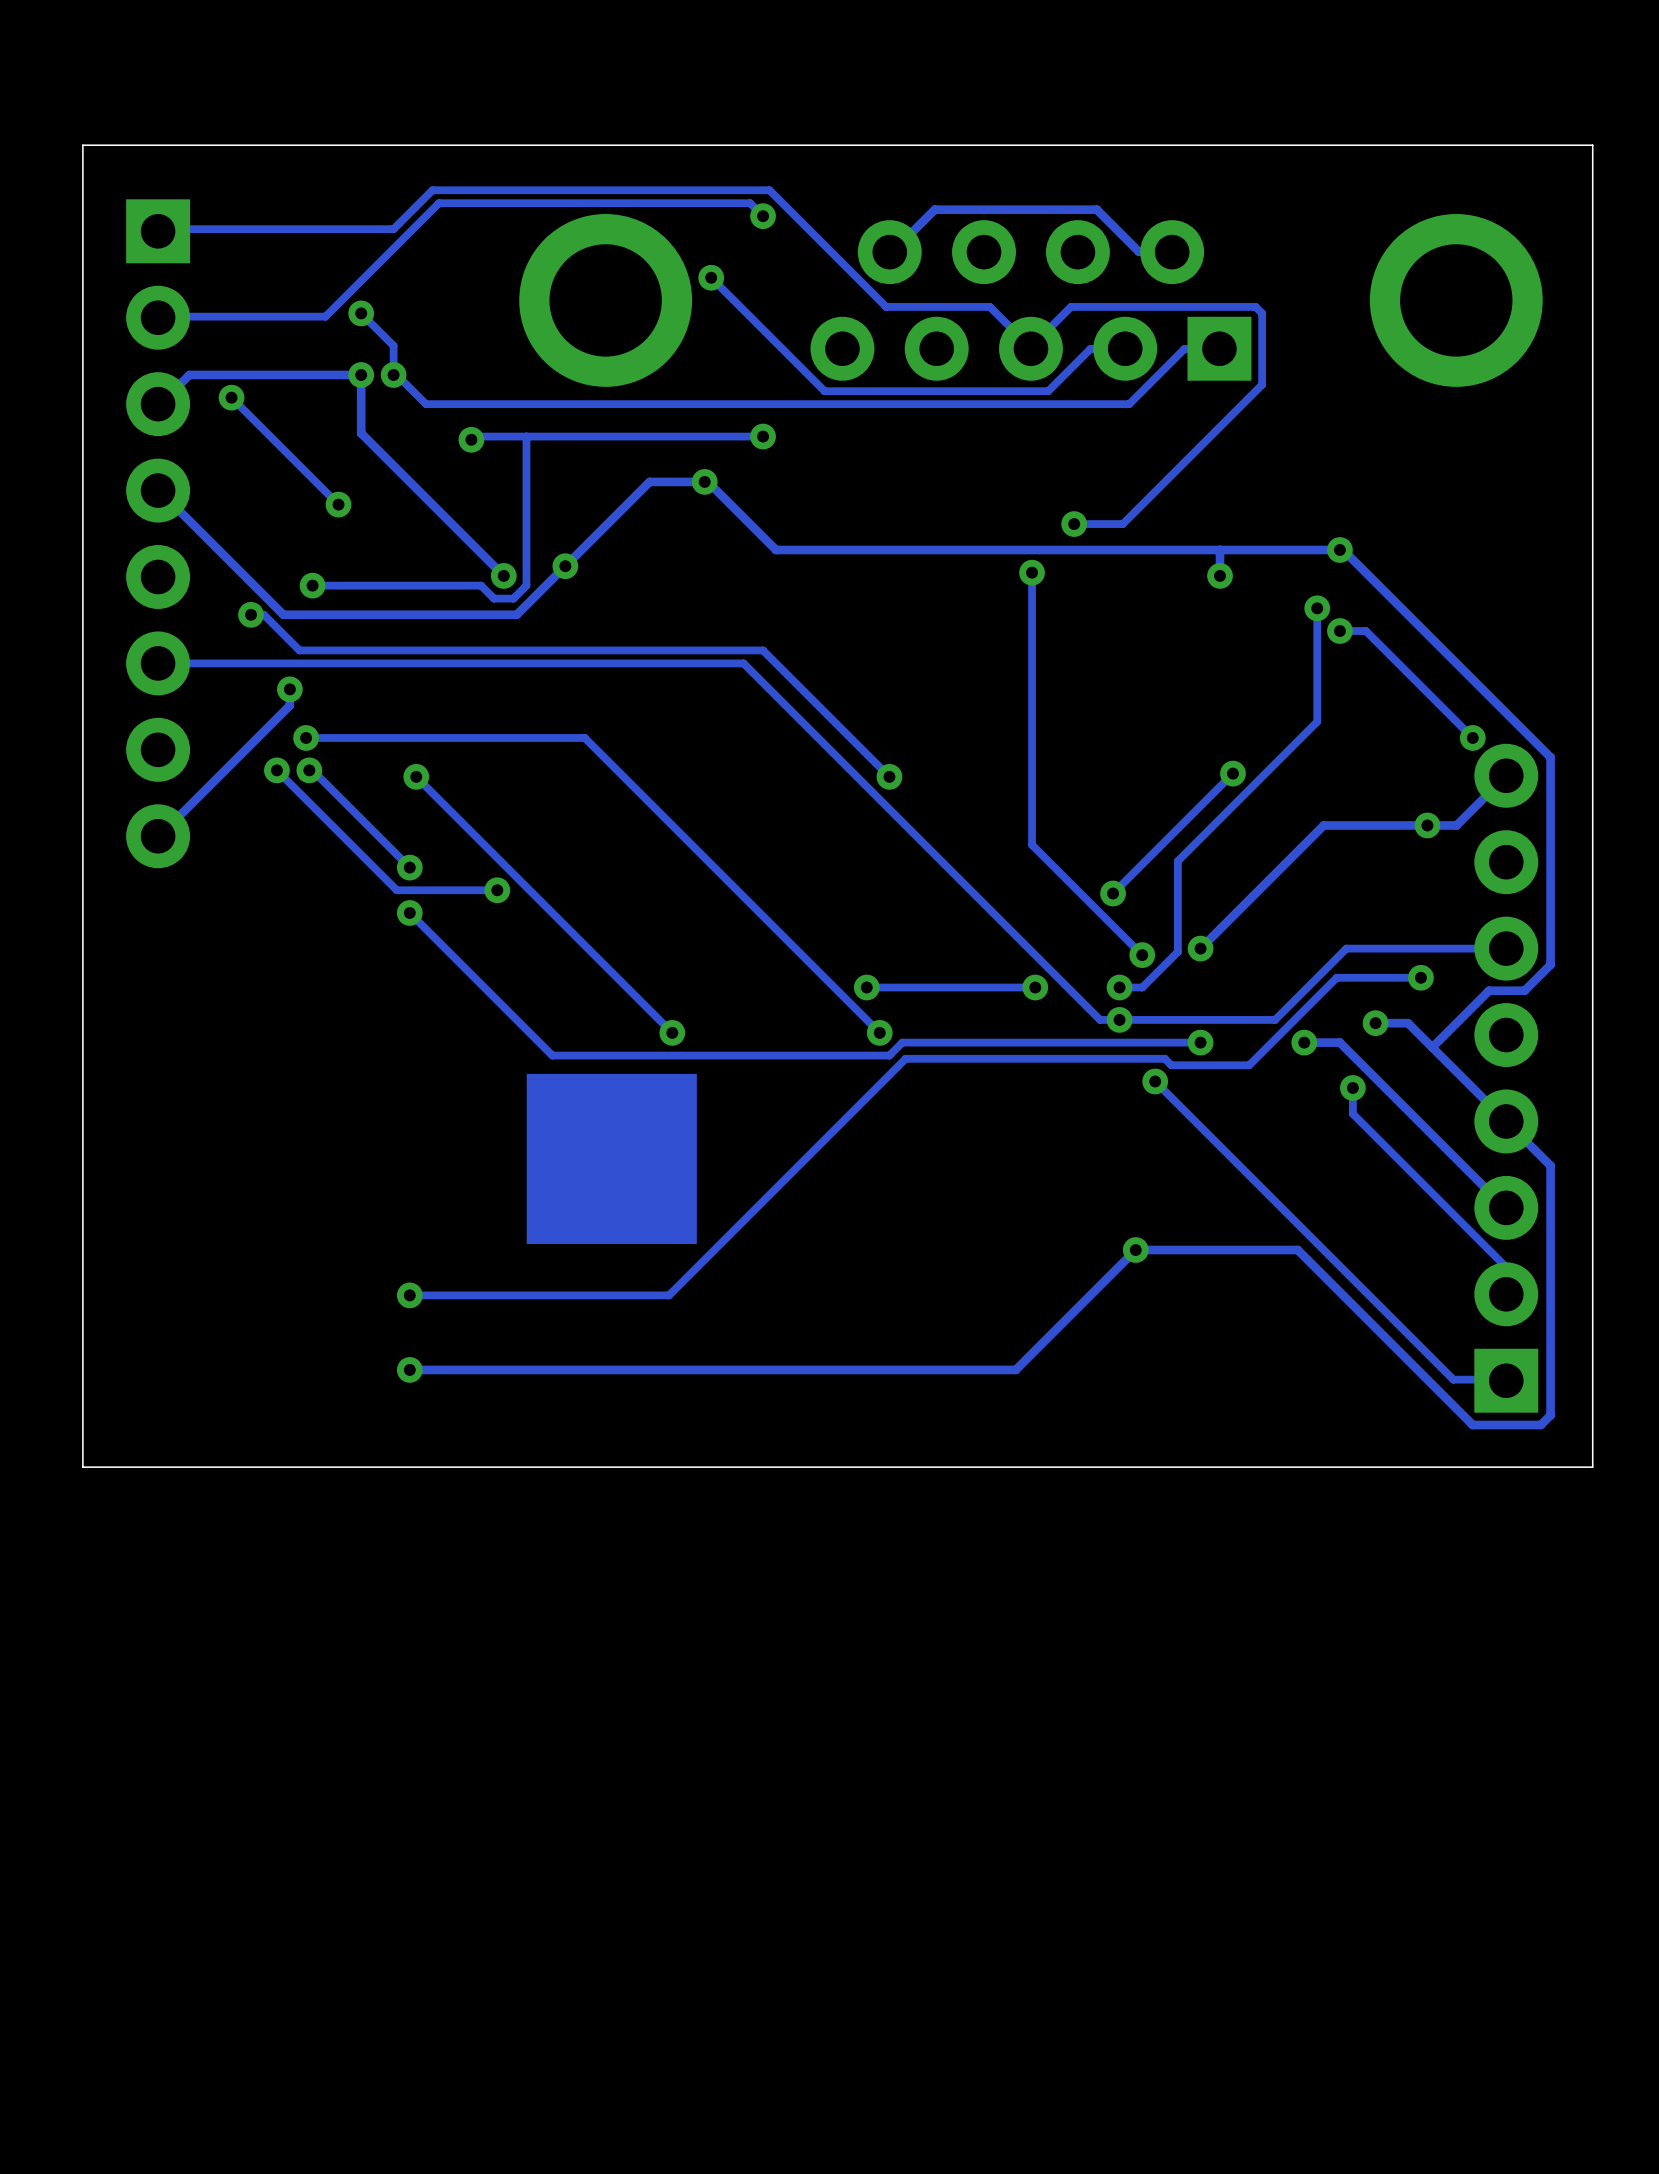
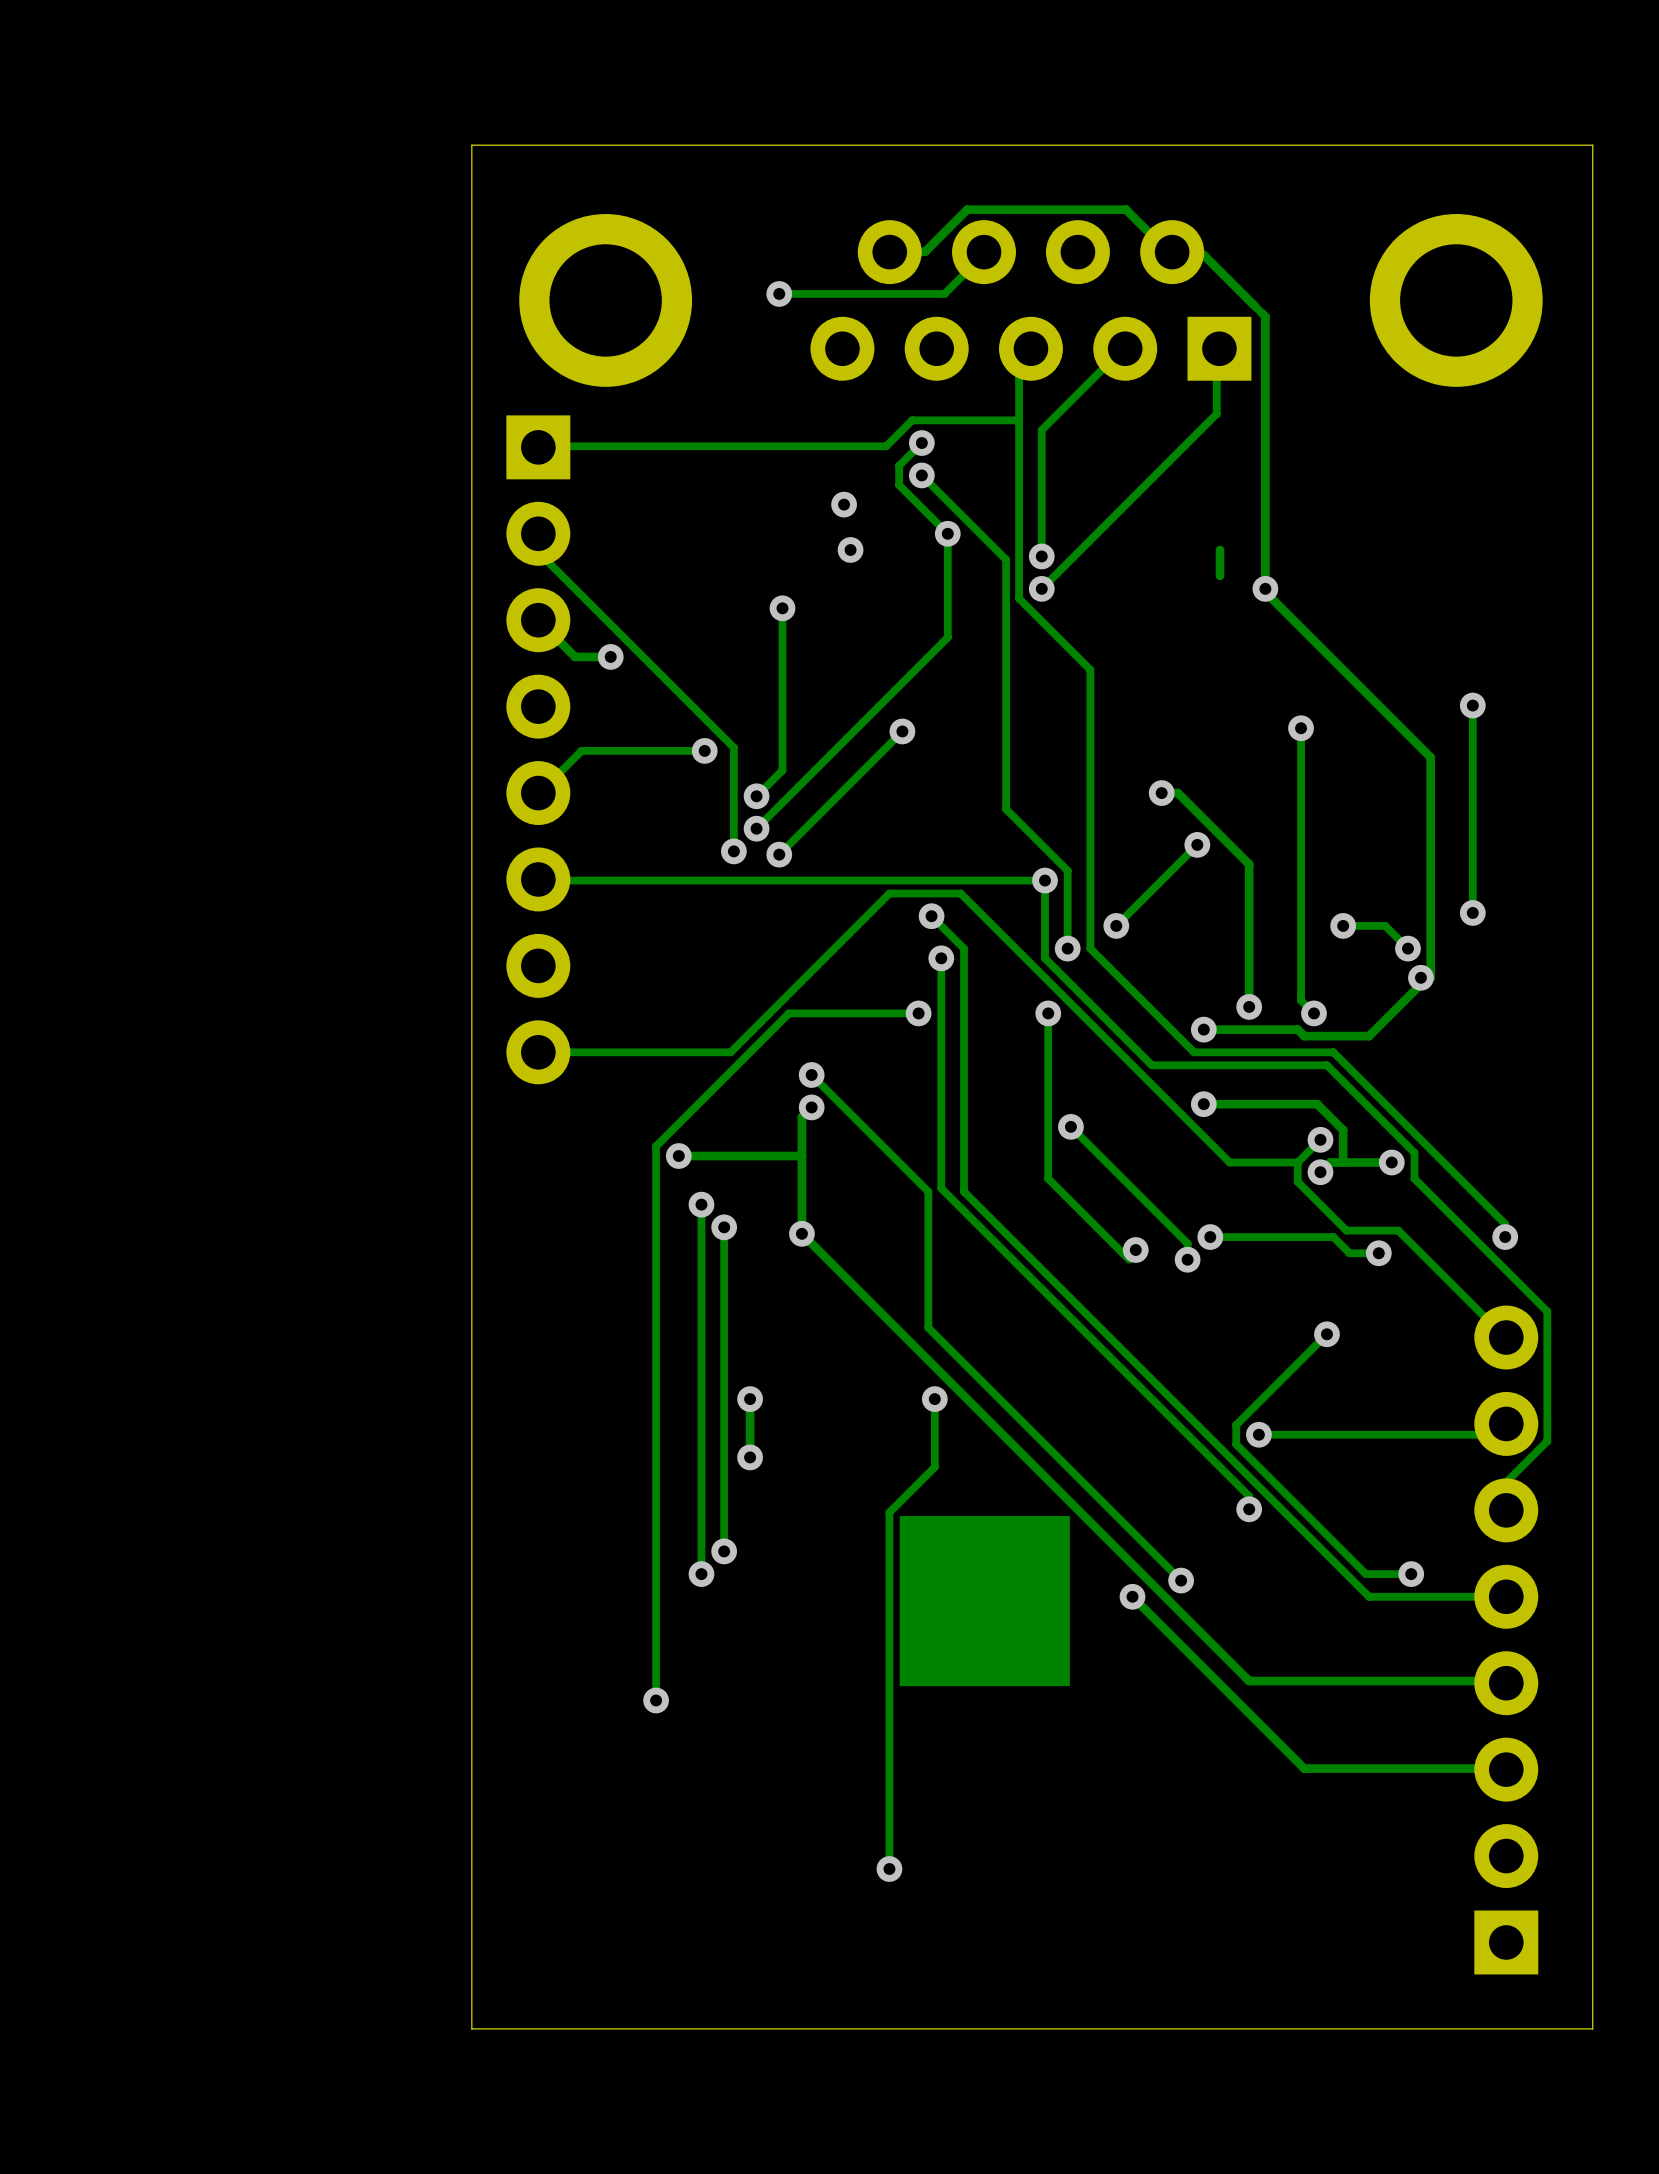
board edge: (471, 145) (82, 145) (82, 1467) (1592, 1467) -> (471, 145) (471, 2028) (1592, 2028) (1592, 1467)
track: (967, 209) (934, 209) (892, 251) -> (967, 209) (925, 251) (892, 251)
track: (1096, 209) (1138, 251) (1172, 252) -> (1096, 209) (1126, 209) (1168, 251) (1172, 252) (1174, 255) (1203, 255) (1255, 306)
track: (763, 216) (750, 203) (438, 203) (325, 316) (158, 317) -> none
via: (763, 216) -> none
track: (158, 231) (160, 229) (393, 229) (432, 190) (769, 190) (886, 306) (989, 306) (1030, 348) (1070, 306) (1255, 306) -> none
track: none -> (984, 252) (983, 255) (944, 293) (779, 293)
track: (711, 277) (824, 391) (1048, 391) (1090, 349) (1122, 349) -> (1041, 556) (1041, 430) (1122, 349)
via: (711, 277) -> none
via: none -> (779, 293)
track: (361, 313) (393, 345) (393, 374) (396, 374) (426, 404) (1129, 404) (1184, 349) (1216, 349) -> (1041, 588) (1216, 413) (1216, 349)
via: (361, 313) -> none
track: (1262, 313) (1262, 384) (1122, 524) (1074, 524) -> (1262, 313) (1265, 316) (1265, 592) (1430, 757) (1430, 977) (1427, 977) (1369, 1036) (1304, 1036) (1297, 1029) (1203, 1029)
track: none -> (1030, 348) (1019, 358) (1019, 598) (1090, 669) (1090, 948) (1194, 1052) (1333, 1052) (1505, 1224) (1505, 1237)
via: (361, 374) -> none
via: (393, 374) -> none
track: (231, 397) (338, 504) -> none
via: (231, 397) -> none
track: (158, 404) (189, 374) (361, 374) (361, 433) (503, 575) -> none
track: none -> (1019, 420) (912, 420) (886, 446) (538, 447)
track: (526, 436) (526, 585) (513, 598) (494, 598) (481, 585) (312, 585) -> none
track: (763, 436) (474, 436) (471, 439) -> none
via: (763, 436) -> none
via: (471, 439) -> none
track: none -> (921, 443) (899, 465) (899, 485) (947, 533) (947, 637) (756, 828)
via: none -> (921, 443)
track: none -> (921, 475) (1006, 559) (1006, 809) (1067, 870) (1067, 948)
via: none -> (921, 475)
via: (704, 481) -> none
track: (158, 490) (283, 614) (516, 614) (649, 481) (707, 481) (776, 549) (1343, 549) (1550, 757) (1550, 964) (1524, 990) (1489, 990) (1432, 1047) -> none
via: (338, 504) -> none
via: none -> (844, 504)
via: (1074, 524) -> none
part position: (158, 533) -> (538, 749)
track: none -> (538, 533) (539, 553) (733, 747) (733, 851)
via: none -> (947, 533)
via: none -> (850, 549)
via: (1339, 549) -> none
via: none -> (1041, 556)
via: (565, 566) -> none
track: (1032, 572) (1032, 844) (1142, 955) -> none
via: (1032, 572) -> none
via: (503, 575) -> none
via: (1220, 575) -> none
via: (312, 585) -> none
via: none -> (1041, 588)
via: none -> (1265, 588)
track: none -> (782, 608) (782, 770) (756, 796)
via: none -> (782, 608)
track: (1317, 608) (1317, 721) (1177, 861) (1177, 951) (1142, 987) (1119, 987) -> none
via: (1317, 608) -> none
track: (250, 614) (263, 614) (299, 650) (763, 650) (889, 776) -> none
via: (250, 614) -> none
track: none -> (538, 620) (575, 656) (610, 656)
track: (1339, 631) (1365, 631) (1472, 737) -> none
via: (1339, 631) -> none
via: none -> (610, 656)
track: (158, 663) (743, 663) (1100, 1019) (1275, 1019) (1346, 948) (1506, 948) -> none
track: (289, 689) (289, 705) (158, 836) -> none
via: (289, 689) -> none
track: none -> (1472, 705) (1472, 912)
track: none -> (1301, 728) (1301, 1000) (1314, 1013)
via: none -> (1301, 728)
track: none -> (902, 731) (779, 854)
track: (306, 737) (584, 737) (879, 1032) -> none
via: (306, 737) -> none
via position: (1472, 737) -> (1472, 705)
track: none -> (704, 750) (581, 750) (538, 793)
via: none -> (704, 750)
track: (276, 770) (396, 890) (497, 890) -> none
via: (276, 770) -> none
track: (309, 770) (312, 770) (409, 867) -> none
via: (309, 770) -> none
track: (1232, 773) (1113, 893) -> none
via: (1232, 773) -> none
track: (1506, 775) (1456, 825) (1323, 825) (1200, 948) -> none
track: (416, 776) (672, 1032) -> none
via: (416, 776) -> none
via position: (889, 776) -> (902, 731)
track: none -> (1161, 793) (1177, 793) (1249, 864) (1249, 1006)
via: none -> (1161, 793)
via: none -> (756, 796)
via: (1427, 825) -> none
via: none -> (756, 828)
track: none -> (1197, 844) (1116, 925)
via: none -> (1197, 844)
via: none -> (733, 851)
via: none -> (779, 854)
via: (409, 867) -> none
via: none -> (1045, 880)
via: (497, 890) -> none
via: (1113, 893) -> none
track: (409, 912) (552, 1055) (889, 1055) (902, 1042) (1200, 1042) -> none
via: (409, 912) -> none
via: none -> (1472, 912)
track: none -> (931, 916) (963, 948) (963, 1191) (1369, 1596) (1506, 1596)
via: none -> (931, 916)
via: none -> (1116, 925)
track: none -> (1343, 925) (1385, 925) (1407, 948)
via: none -> (1343, 925)
via: none -> (1067, 948)
via: (1200, 948) -> none
via: none -> (1407, 948)
via: (1142, 955) -> none
track: none -> (941, 958) (941, 1188) (1249, 1496) (1249, 1509)
via: none -> (941, 958)
track: (1420, 977) (1336, 977) (1249, 1065) -> (1506, 1510) (1508, 1509) (1508, 1480) (1547, 1441) (1547, 1311) (1414, 1178) (1414, 1152) (1326, 1065) (1249, 1065)
via: (866, 987) -> none
track: (1035, 987) (866, 987) -> none
via: (1035, 987) -> none
via: (1119, 987) -> none
via: none -> (1249, 1006)
track: none -> (918, 1013) (788, 1013) (656, 1146) (656, 1700)
via: none -> (918, 1013)
track: none -> (1048, 1013) (1048, 1178) (1129, 1259)
via: none -> (1048, 1013)
via: (1119, 1019) -> none
track: (1375, 1023) (1407, 1023) (1550, 1165) (1550, 1415) (1540, 1425) (1472, 1425) (1297, 1250) (1135, 1250) (1015, 1369) (409, 1369) -> none
via: (1375, 1023) -> none
via: (672, 1032) -> none
via: (879, 1032) -> none
via position: (1200, 1042) -> (1203, 1029)
track: (1304, 1042) (1339, 1042) (1506, 1207) -> none
via position: (1304, 1042) -> (1314, 1013)
track: none -> (538, 1052) (730, 1052) (889, 893) (960, 893) (1229, 1162) (1297, 1162)
track: (1171, 1065) (1164, 1058) (905, 1058) (669, 1295) (409, 1295) -> (1171, 1065) (1151, 1065) (1045, 958) (1045, 880) (538, 879)
track: none -> (811, 1075) (928, 1191) (928, 1327) (1181, 1580)
via: none -> (811, 1075)
part: (1506, 1078) -> none
track: (1155, 1081) (1453, 1379) (1506, 1380) -> none
via: (1155, 1081) -> none
track: (1352, 1087) (1352, 1113) (1505, 1266) (1506, 1294) -> none
via: (1352, 1087) -> none
track: none -> (1203, 1104) (1317, 1104) (1343, 1130) (1343, 1162)
via: none -> (1203, 1104)
track: none -> (811, 1107) (801, 1117) (801, 1233) (1249, 1681) (1505, 1681) (1506, 1683)
via: none -> (811, 1107)
track: none -> (1070, 1126) (1187, 1243) (1187, 1259)
via: none -> (1070, 1126)
track: none -> (1320, 1139) (1297, 1162)
via: none -> (1320, 1139)
via: none -> (678, 1156)
track: none -> (801, 1156) (678, 1156)
part position: (611, 1158) -> (984, 1601)
track: none -> (1297, 1162) (1297, 1181) (1346, 1230) (1398, 1230) (1506, 1337)
track: none -> (1391, 1162) (1330, 1162) (1320, 1172)
via: none -> (1391, 1162)
via: none -> (1320, 1172)
track: none -> (701, 1204) (701, 1574)
via: none -> (701, 1204)
track: none -> (724, 1227) (724, 1551)
via: none -> (724, 1227)
via: none -> (801, 1233)
track: none -> (1210, 1237) (1333, 1237) (1349, 1253) (1378, 1253)
via: none -> (1210, 1237)
via: none -> (1505, 1237)
via: none -> (1378, 1253)
via: none -> (1187, 1259)
via: (409, 1295) -> none
track: none -> (1326, 1334) (1236, 1425) (1236, 1444) (1365, 1574) (1411, 1574)
via: none -> (1326, 1334)
via: (409, 1369) -> none
track: none -> (750, 1399) (750, 1457)
via: none -> (750, 1399)
track: none -> (934, 1399) (934, 1467) (889, 1512) (889, 1869)
via: none -> (934, 1399)
track: none -> (1506, 1423) (1495, 1434) (1258, 1434)
via: none -> (1258, 1434)
via: none -> (750, 1457)
via: none -> (1249, 1509)
via: none -> (724, 1551)
via: none -> (701, 1574)
via: none -> (1411, 1574)
via: none -> (1181, 1580)
track: none -> (1132, 1596) (1304, 1768) (1506, 1769)
via: none -> (1132, 1596)
part: none -> (1506, 1640)
via: none -> (656, 1700)
via: none -> (889, 1869)

